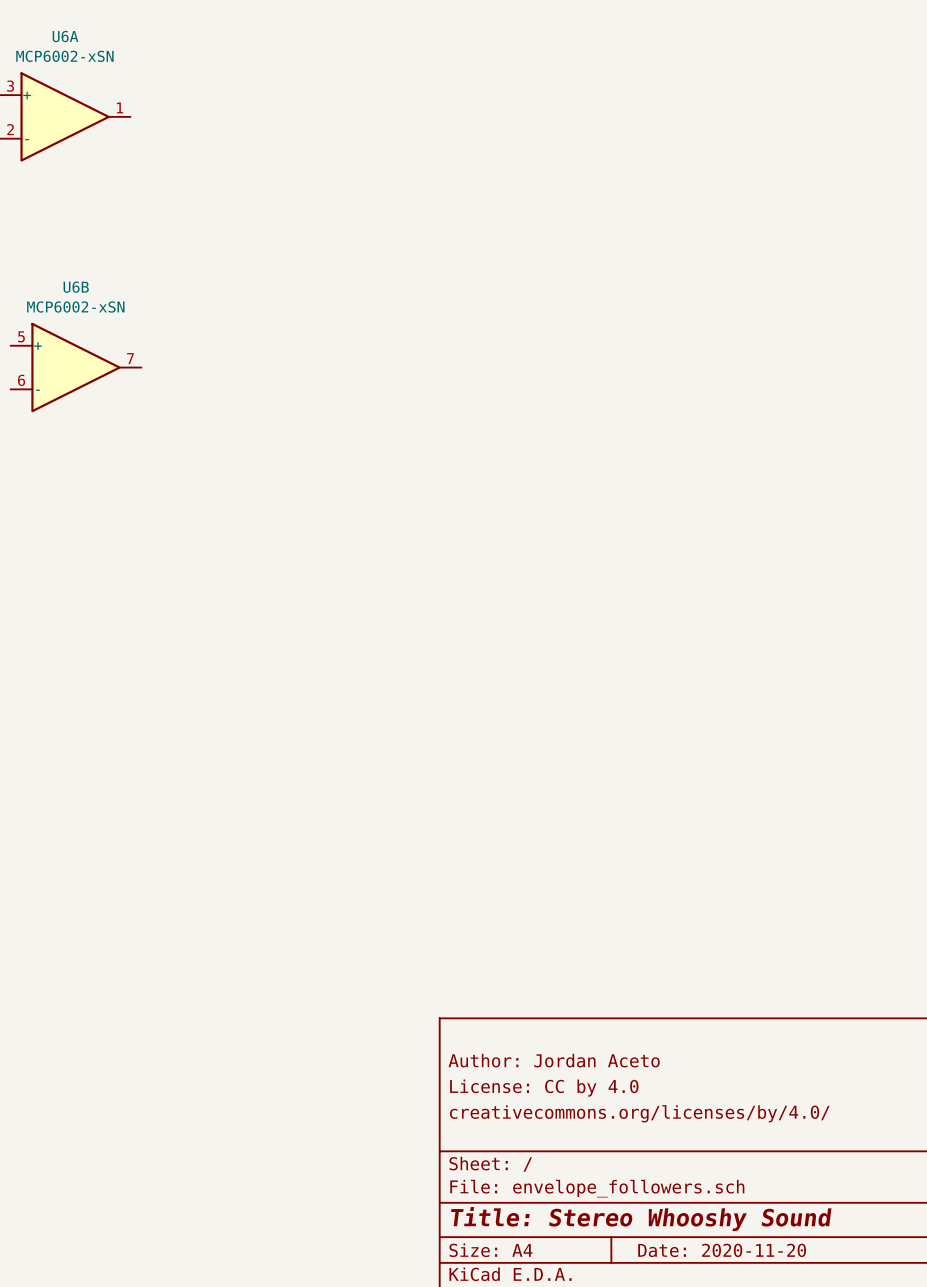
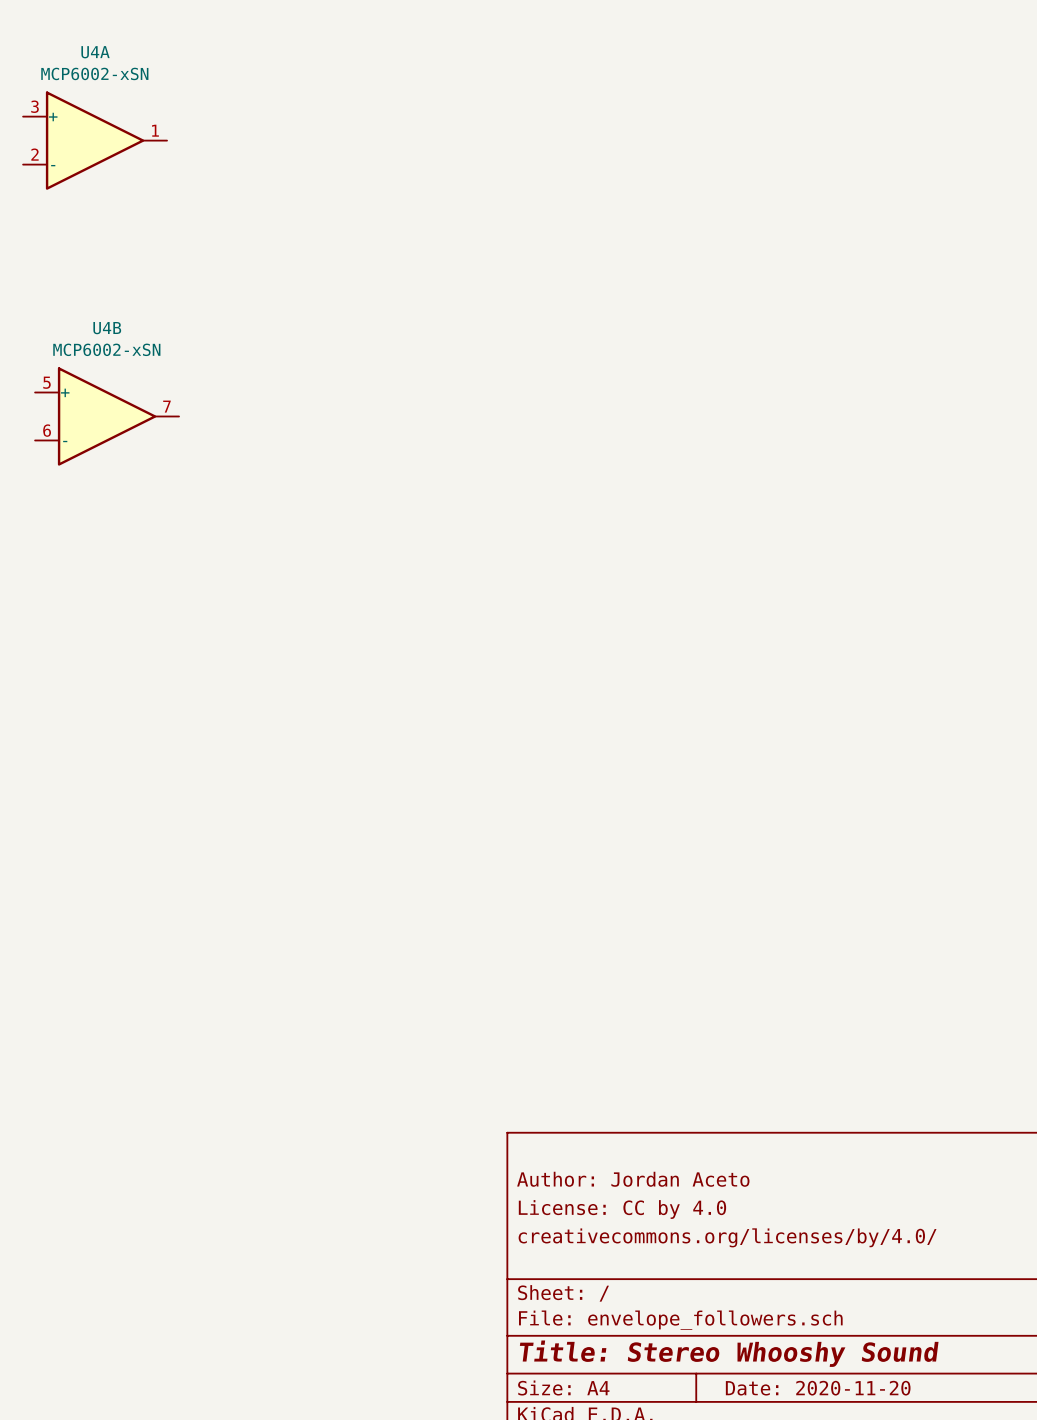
U6A name: U6A (65, 36) -> U4A (95, 52)
U6B name: U6B (76, 287) -> U4B (107, 328)

